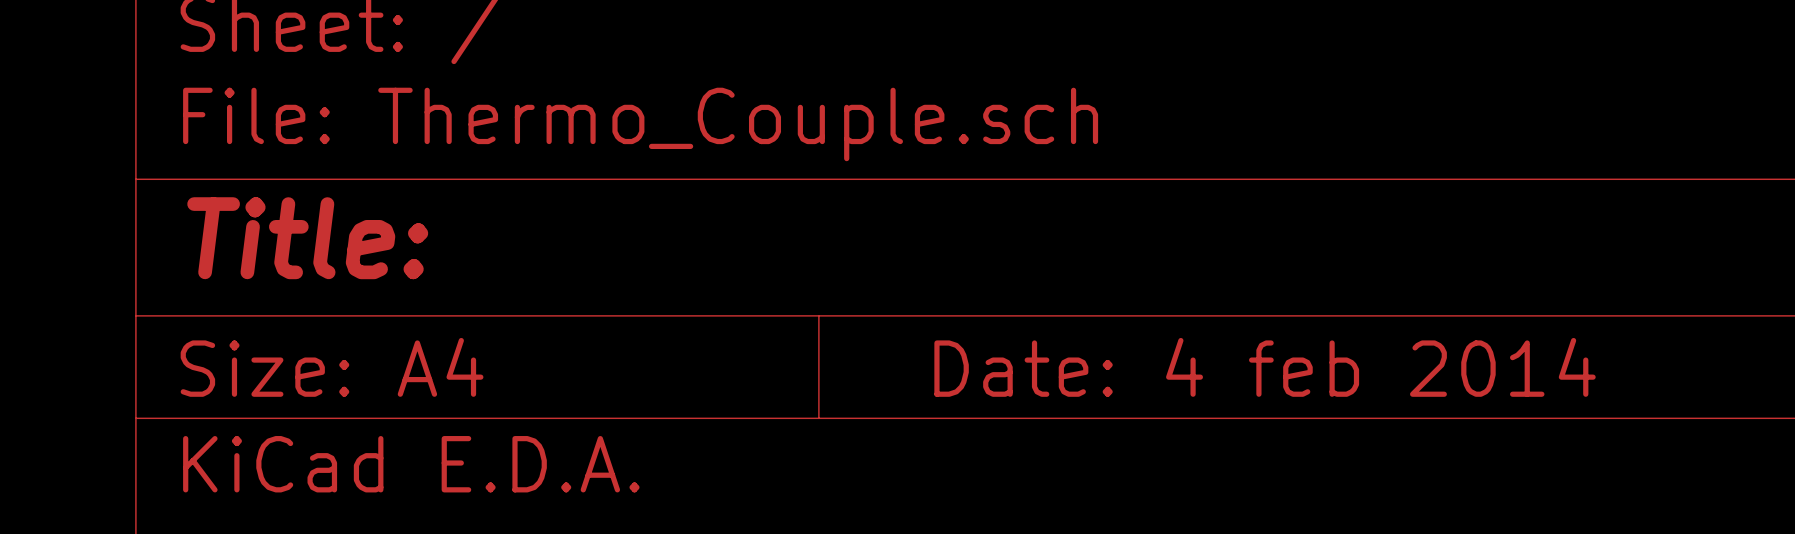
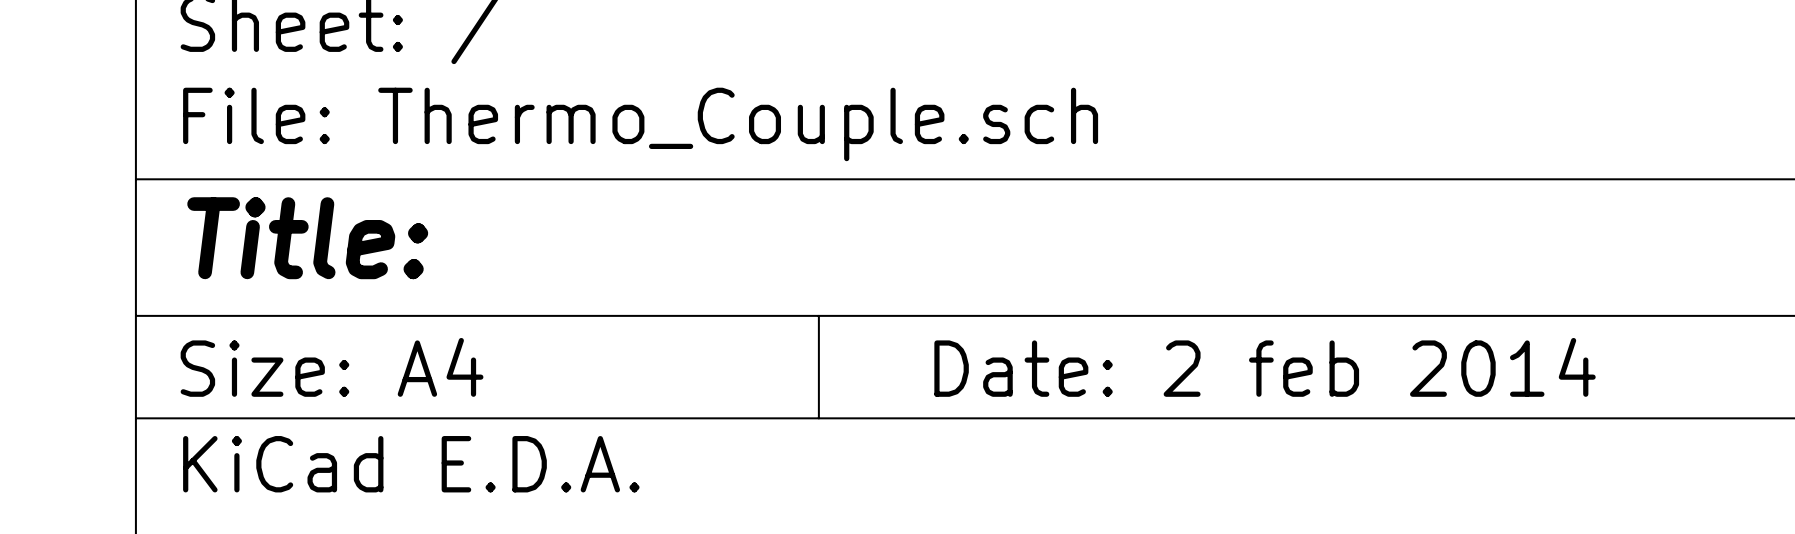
title block: Date: 4 feb 2014 (1265, 367) -> Date: 2 feb 2014 (1265, 367)

